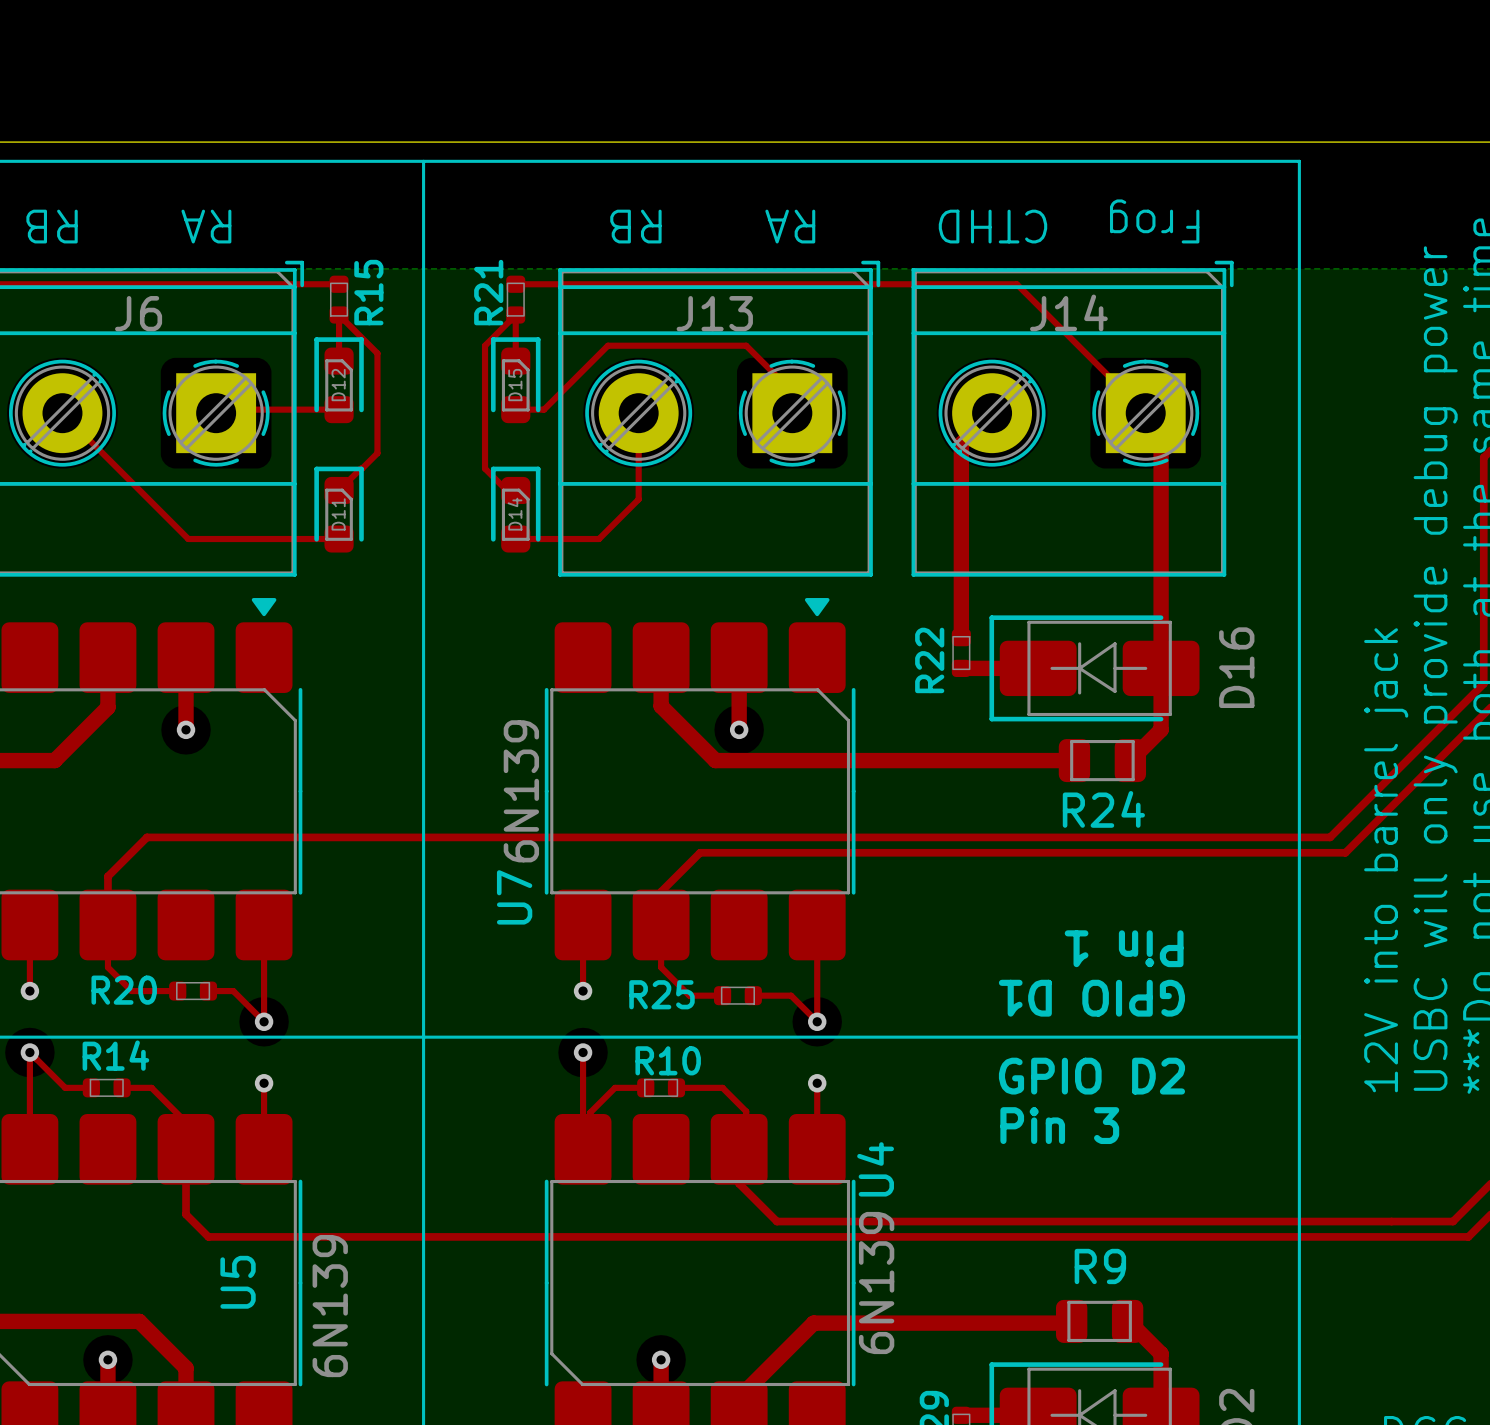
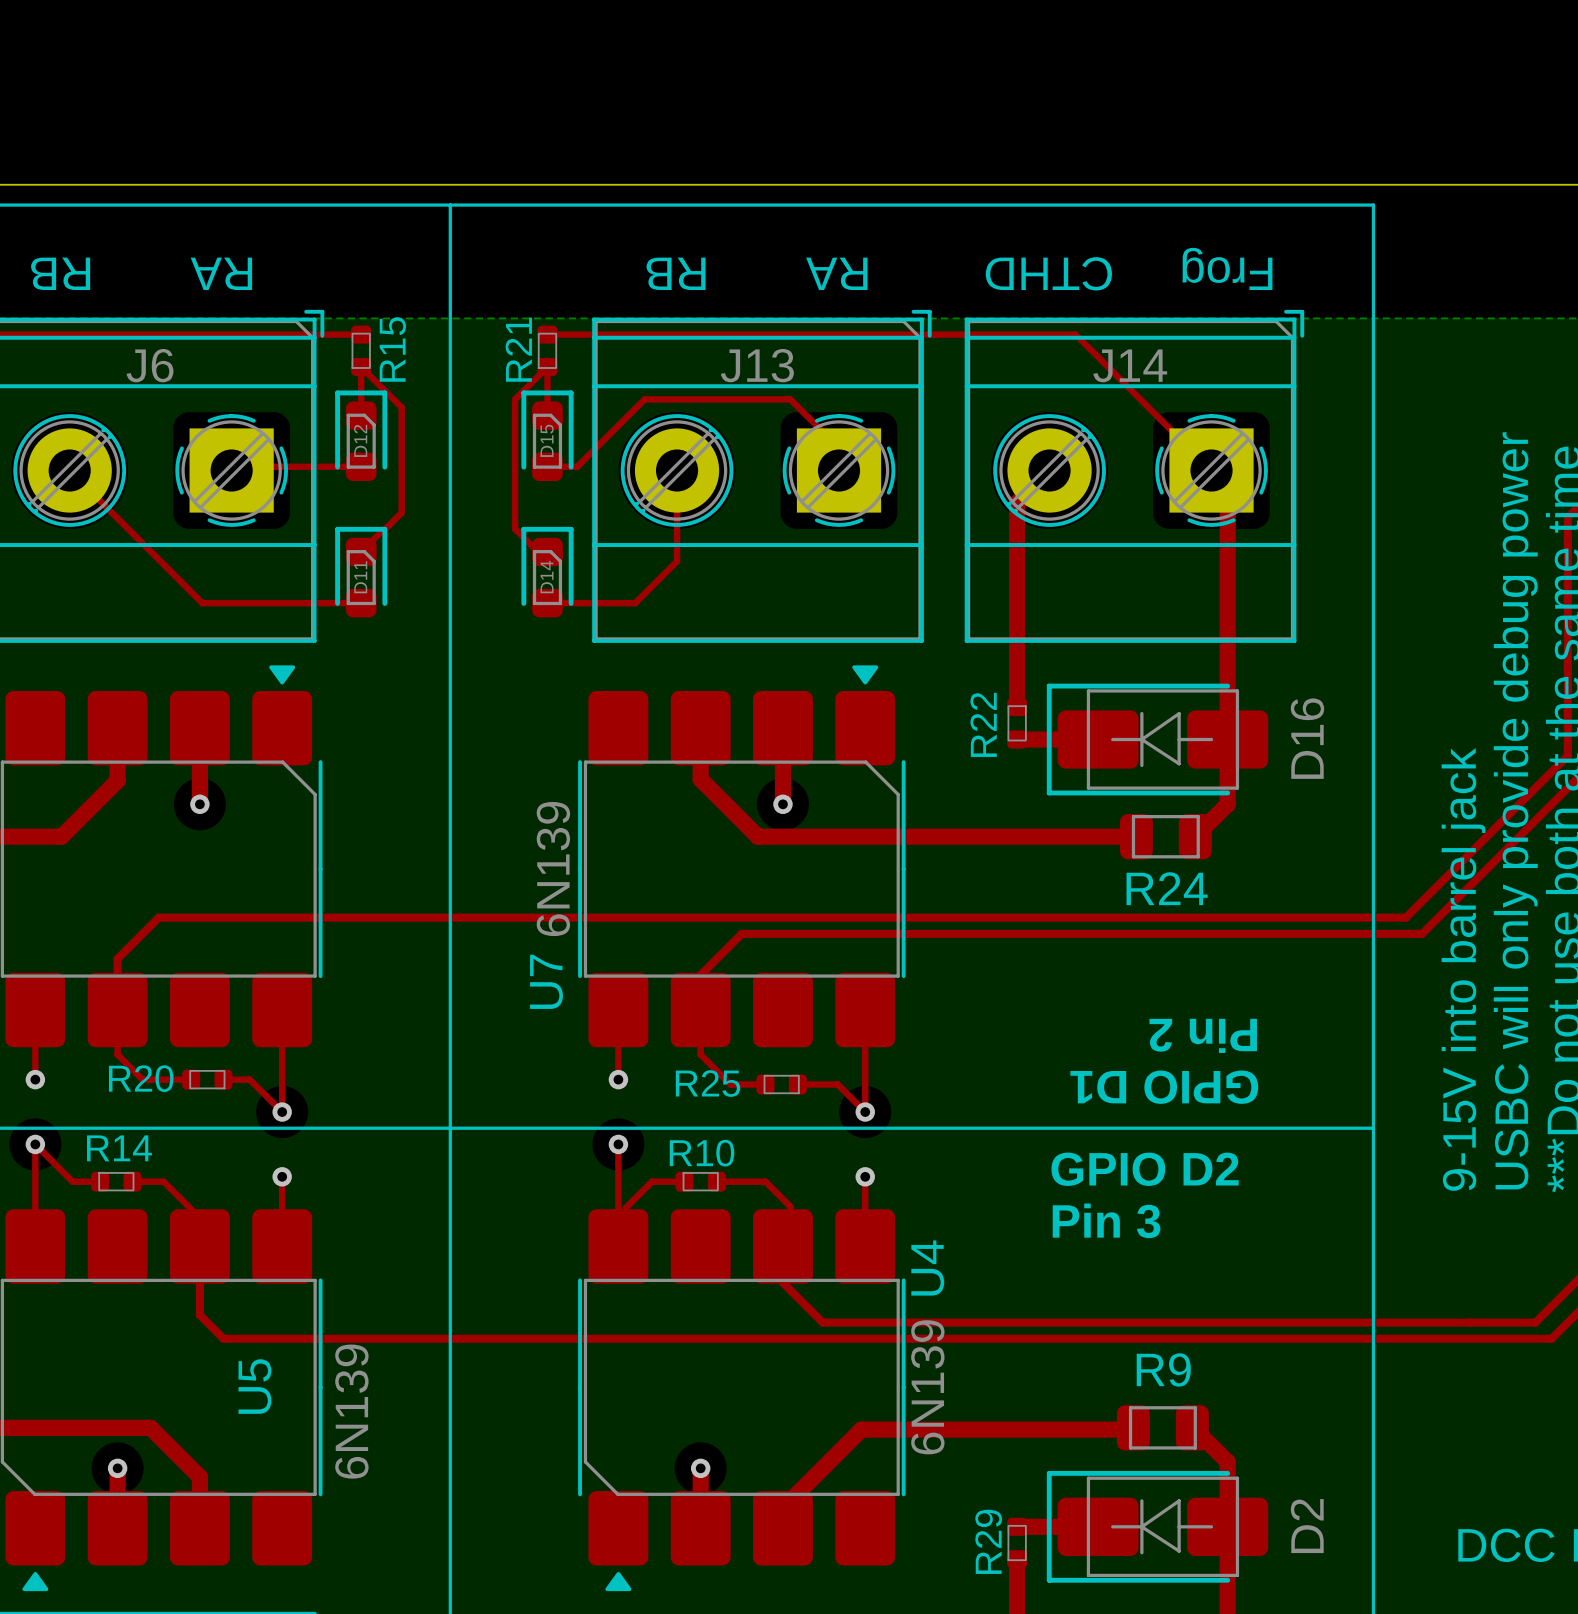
text: 12V into barrel jack (1386, 860) -> 9-15V into barrel jack (1463, 969)
text: Pin 1 (1124, 948) -> Pin 2 (1203, 1035)

